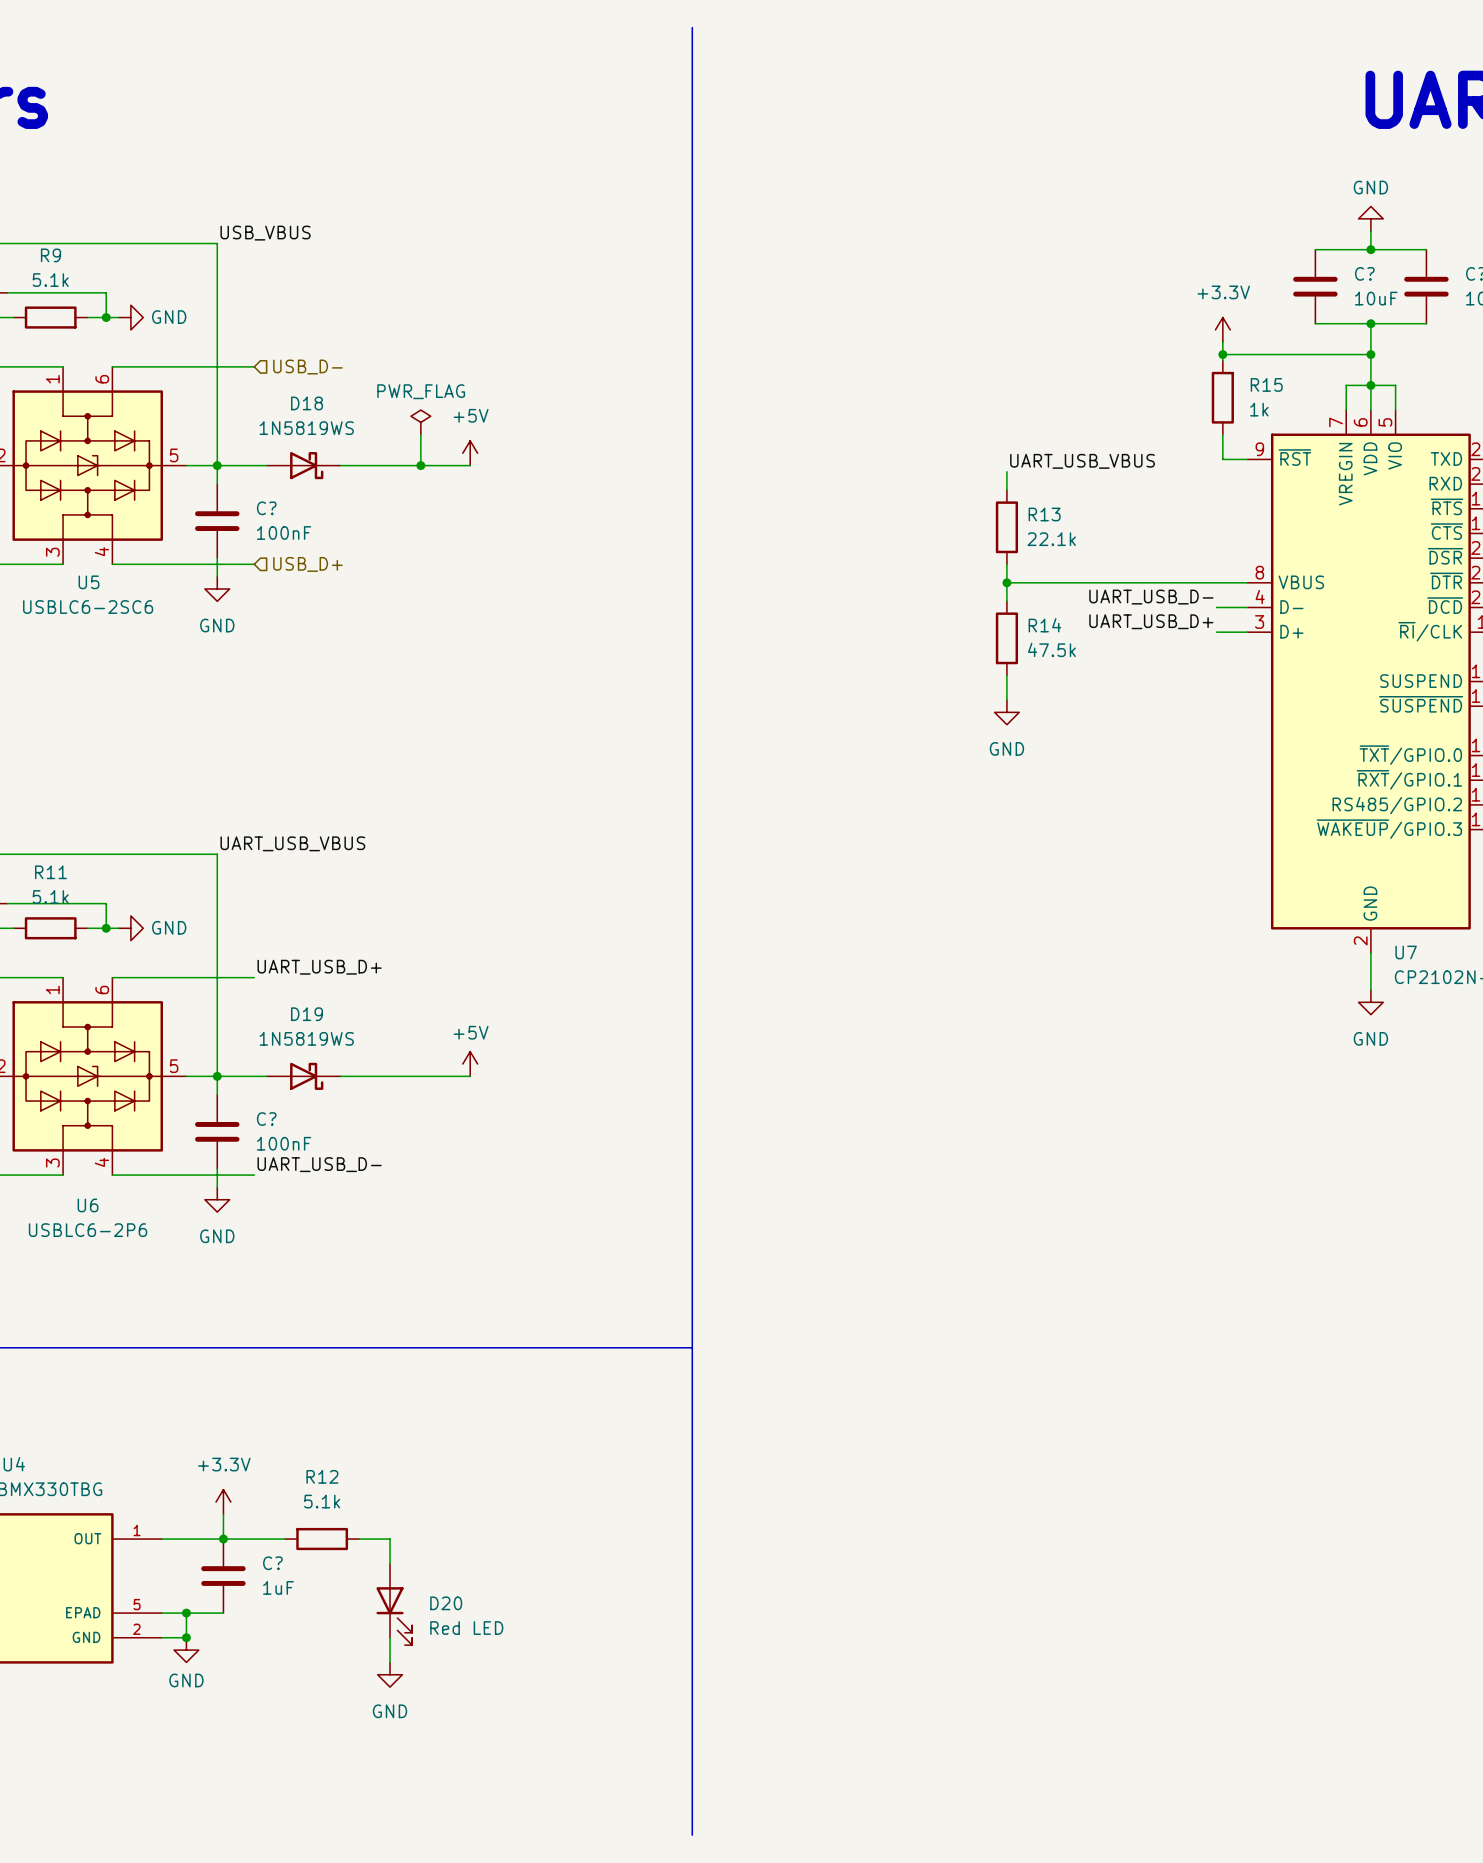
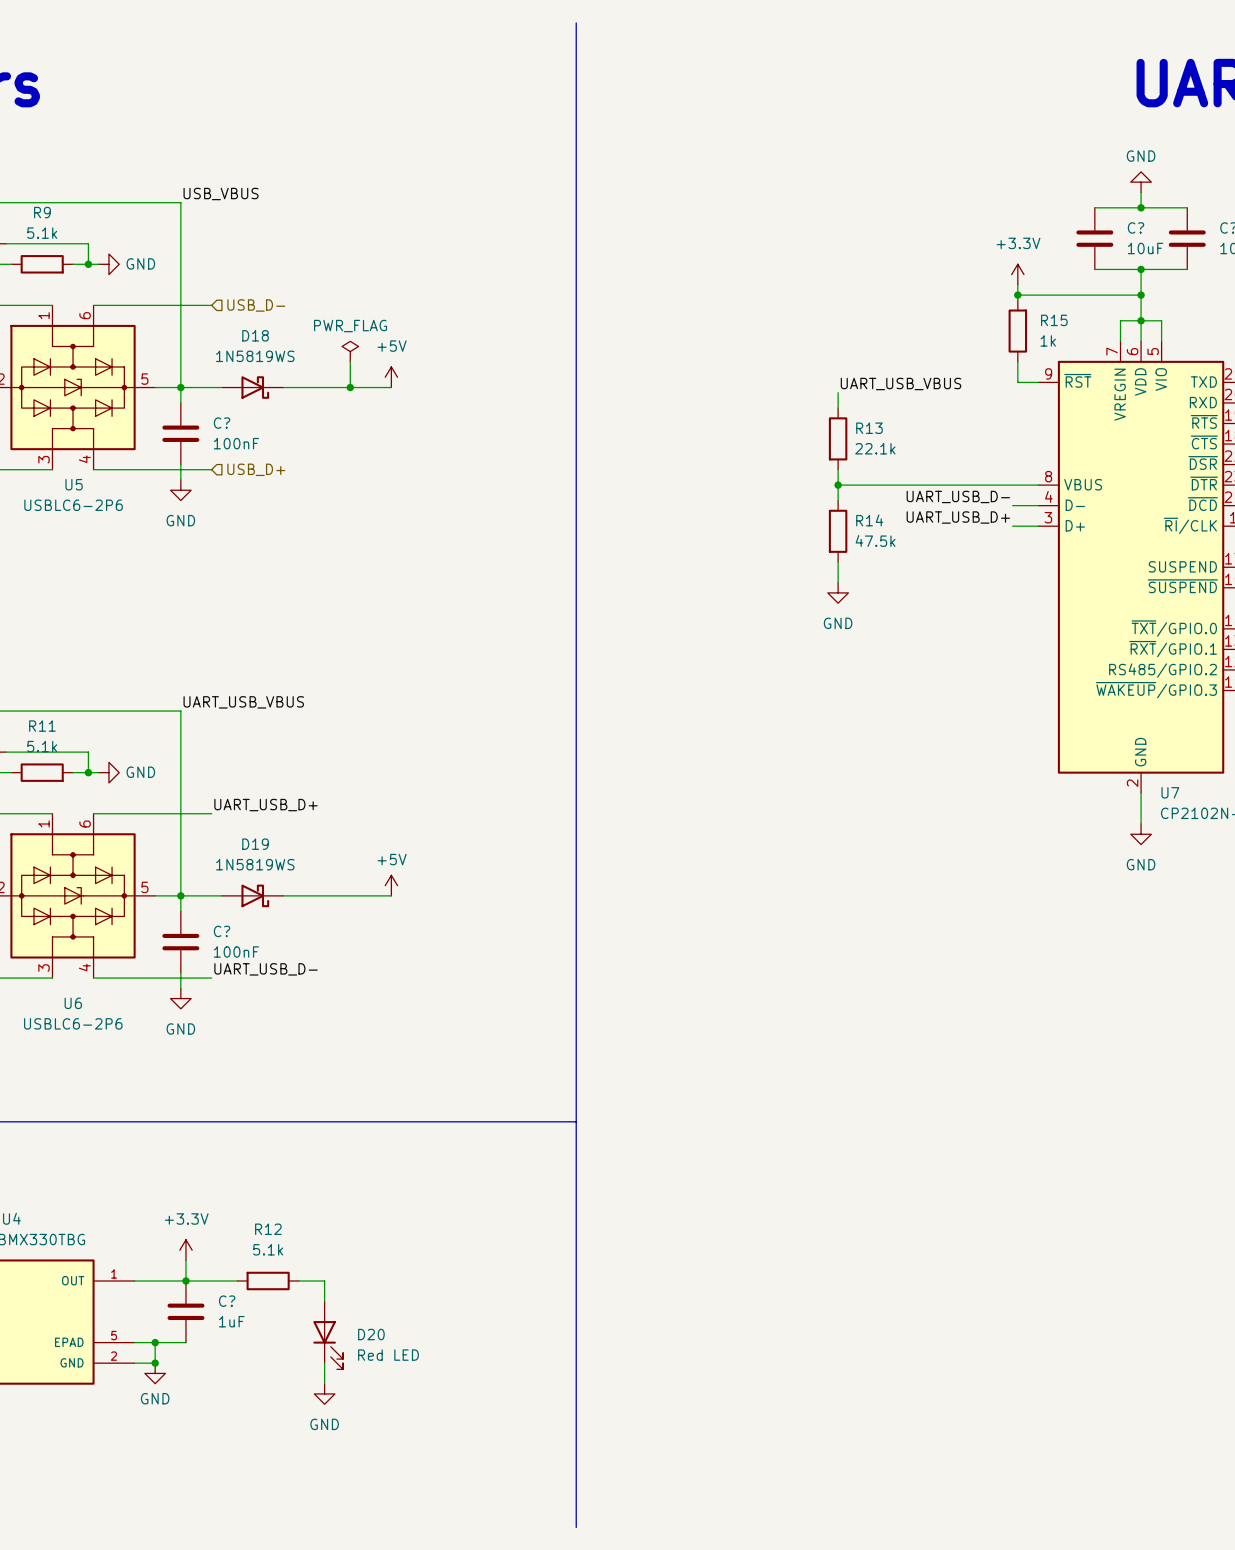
U5 value: USBLC6-2SC6 (88, 607) -> USBLC6-2P6 (73, 505)

